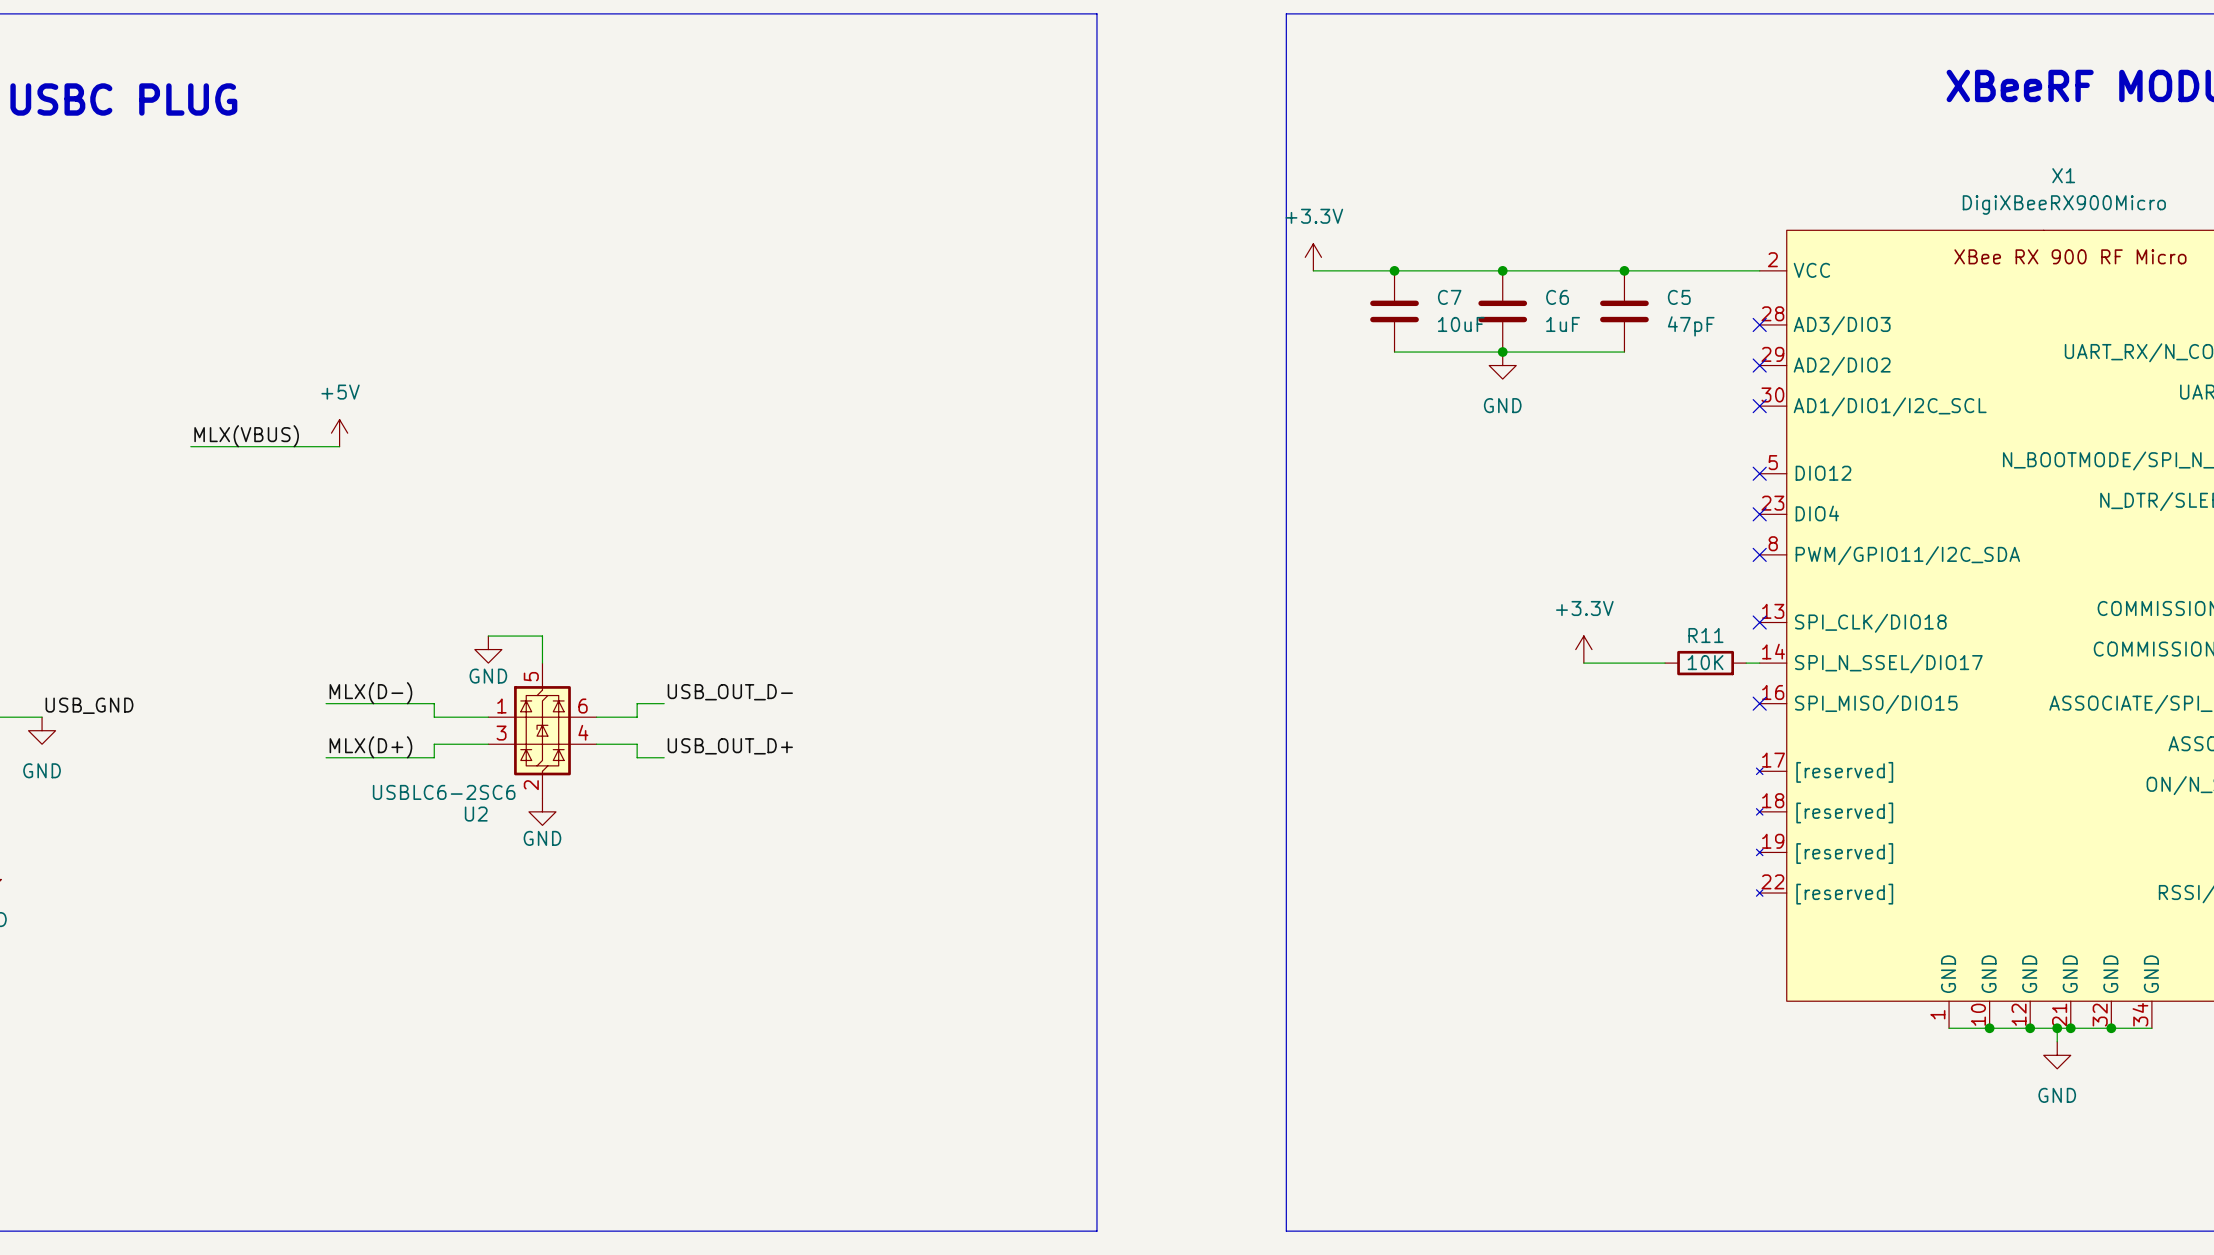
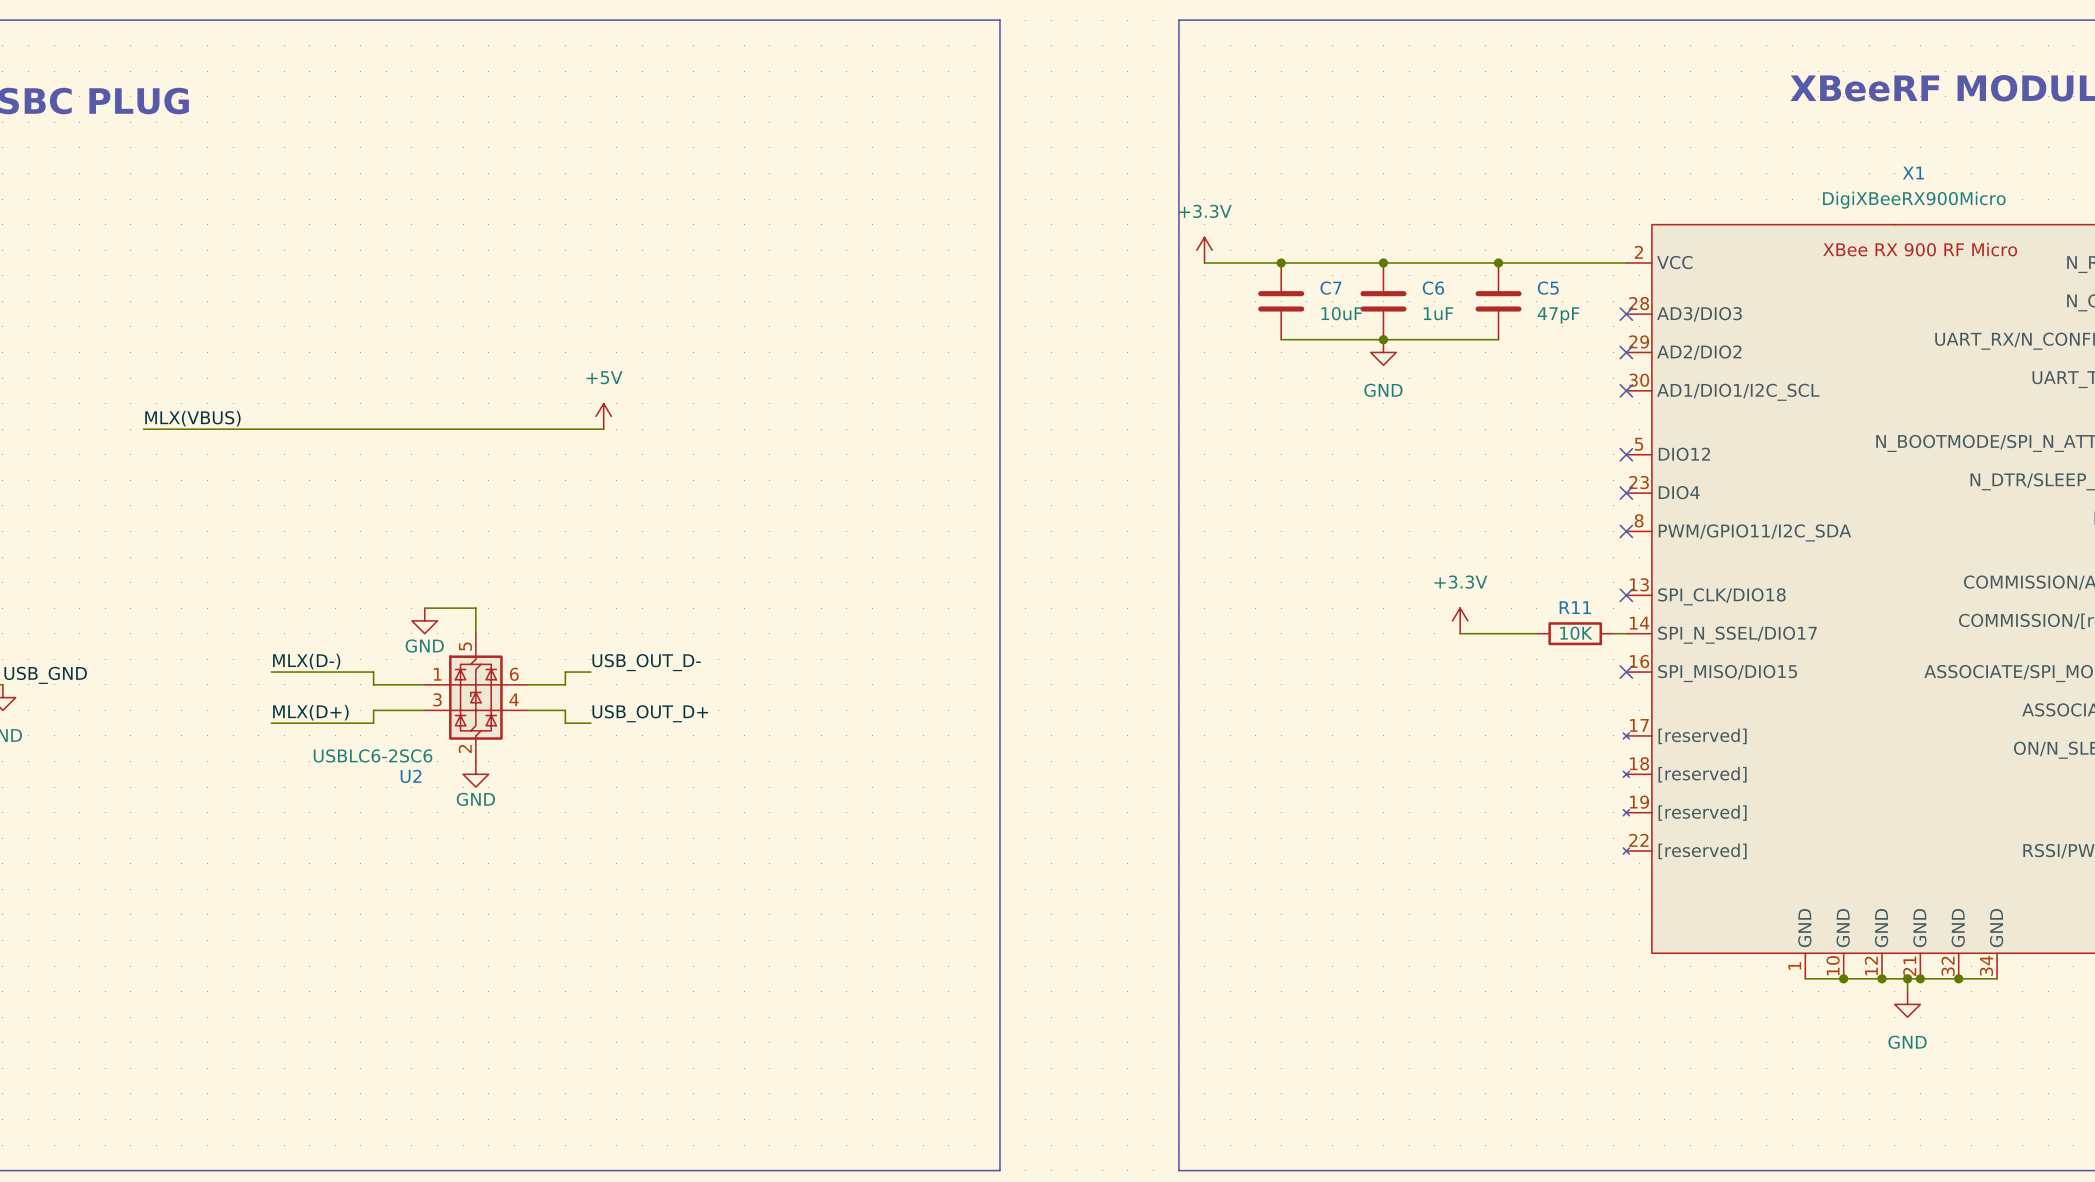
power symbol: +5V (339, 433) -> none
power symbol: none -> +5V (603, 416)
wire: none -> (284, 429) (603, 429)

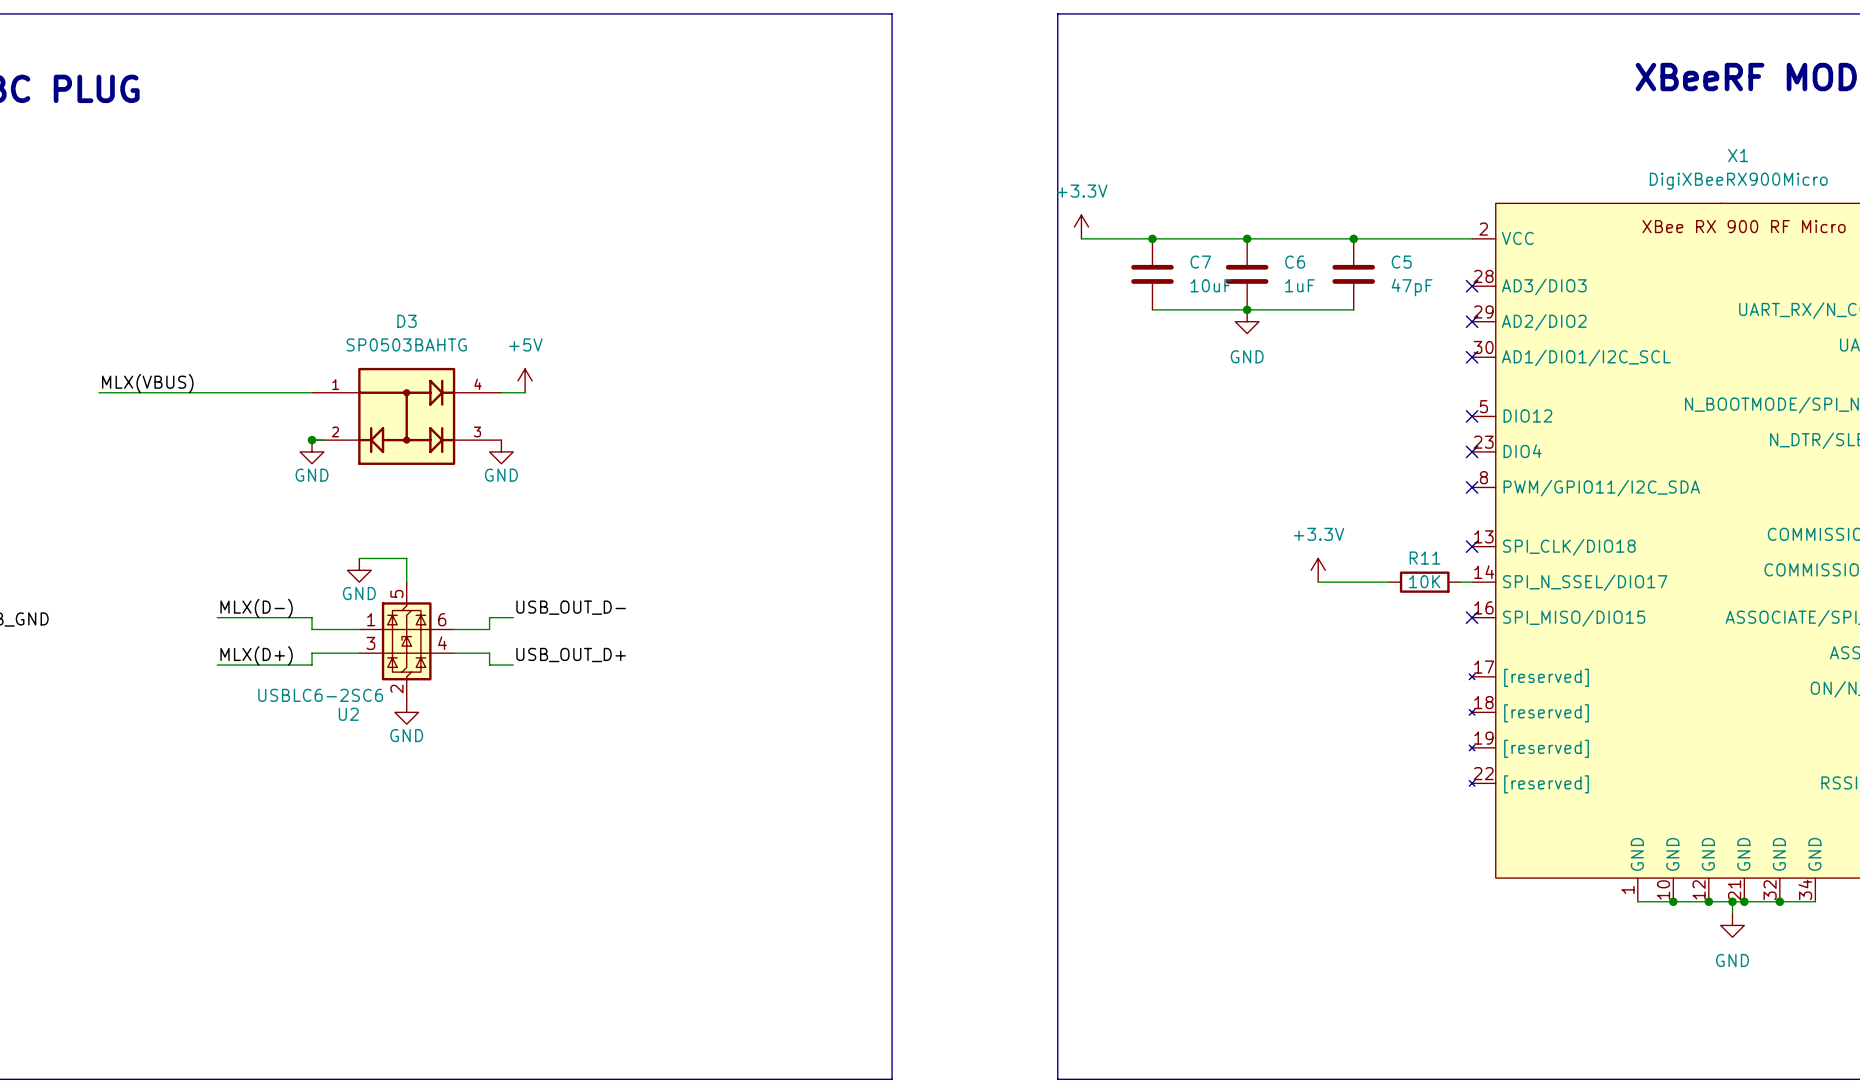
D3: none -> SP0503BAHTG (406, 416)
wire: none -> (312, 440) (323, 440)
junction: none -> (312, 440)
power symbol: none -> GND (312, 451)
power symbol: none -> GND (501, 451)

